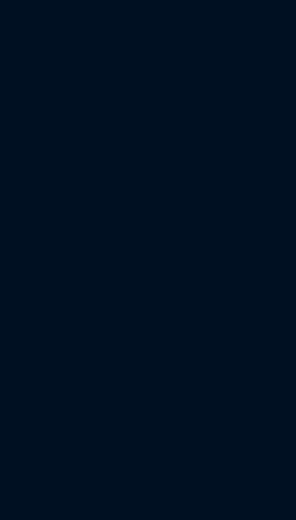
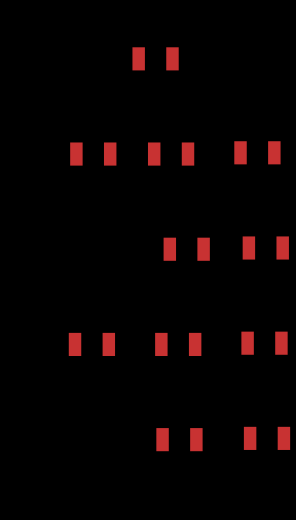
part: none -> (155, 58)
part: none -> (257, 152)
part: none -> (93, 154)
part: none -> (171, 154)
part: none -> (265, 247)
part: none -> (186, 249)
part: none -> (264, 343)
part: none -> (91, 344)
part: none -> (178, 344)
part: none -> (267, 438)
part: none -> (179, 439)

